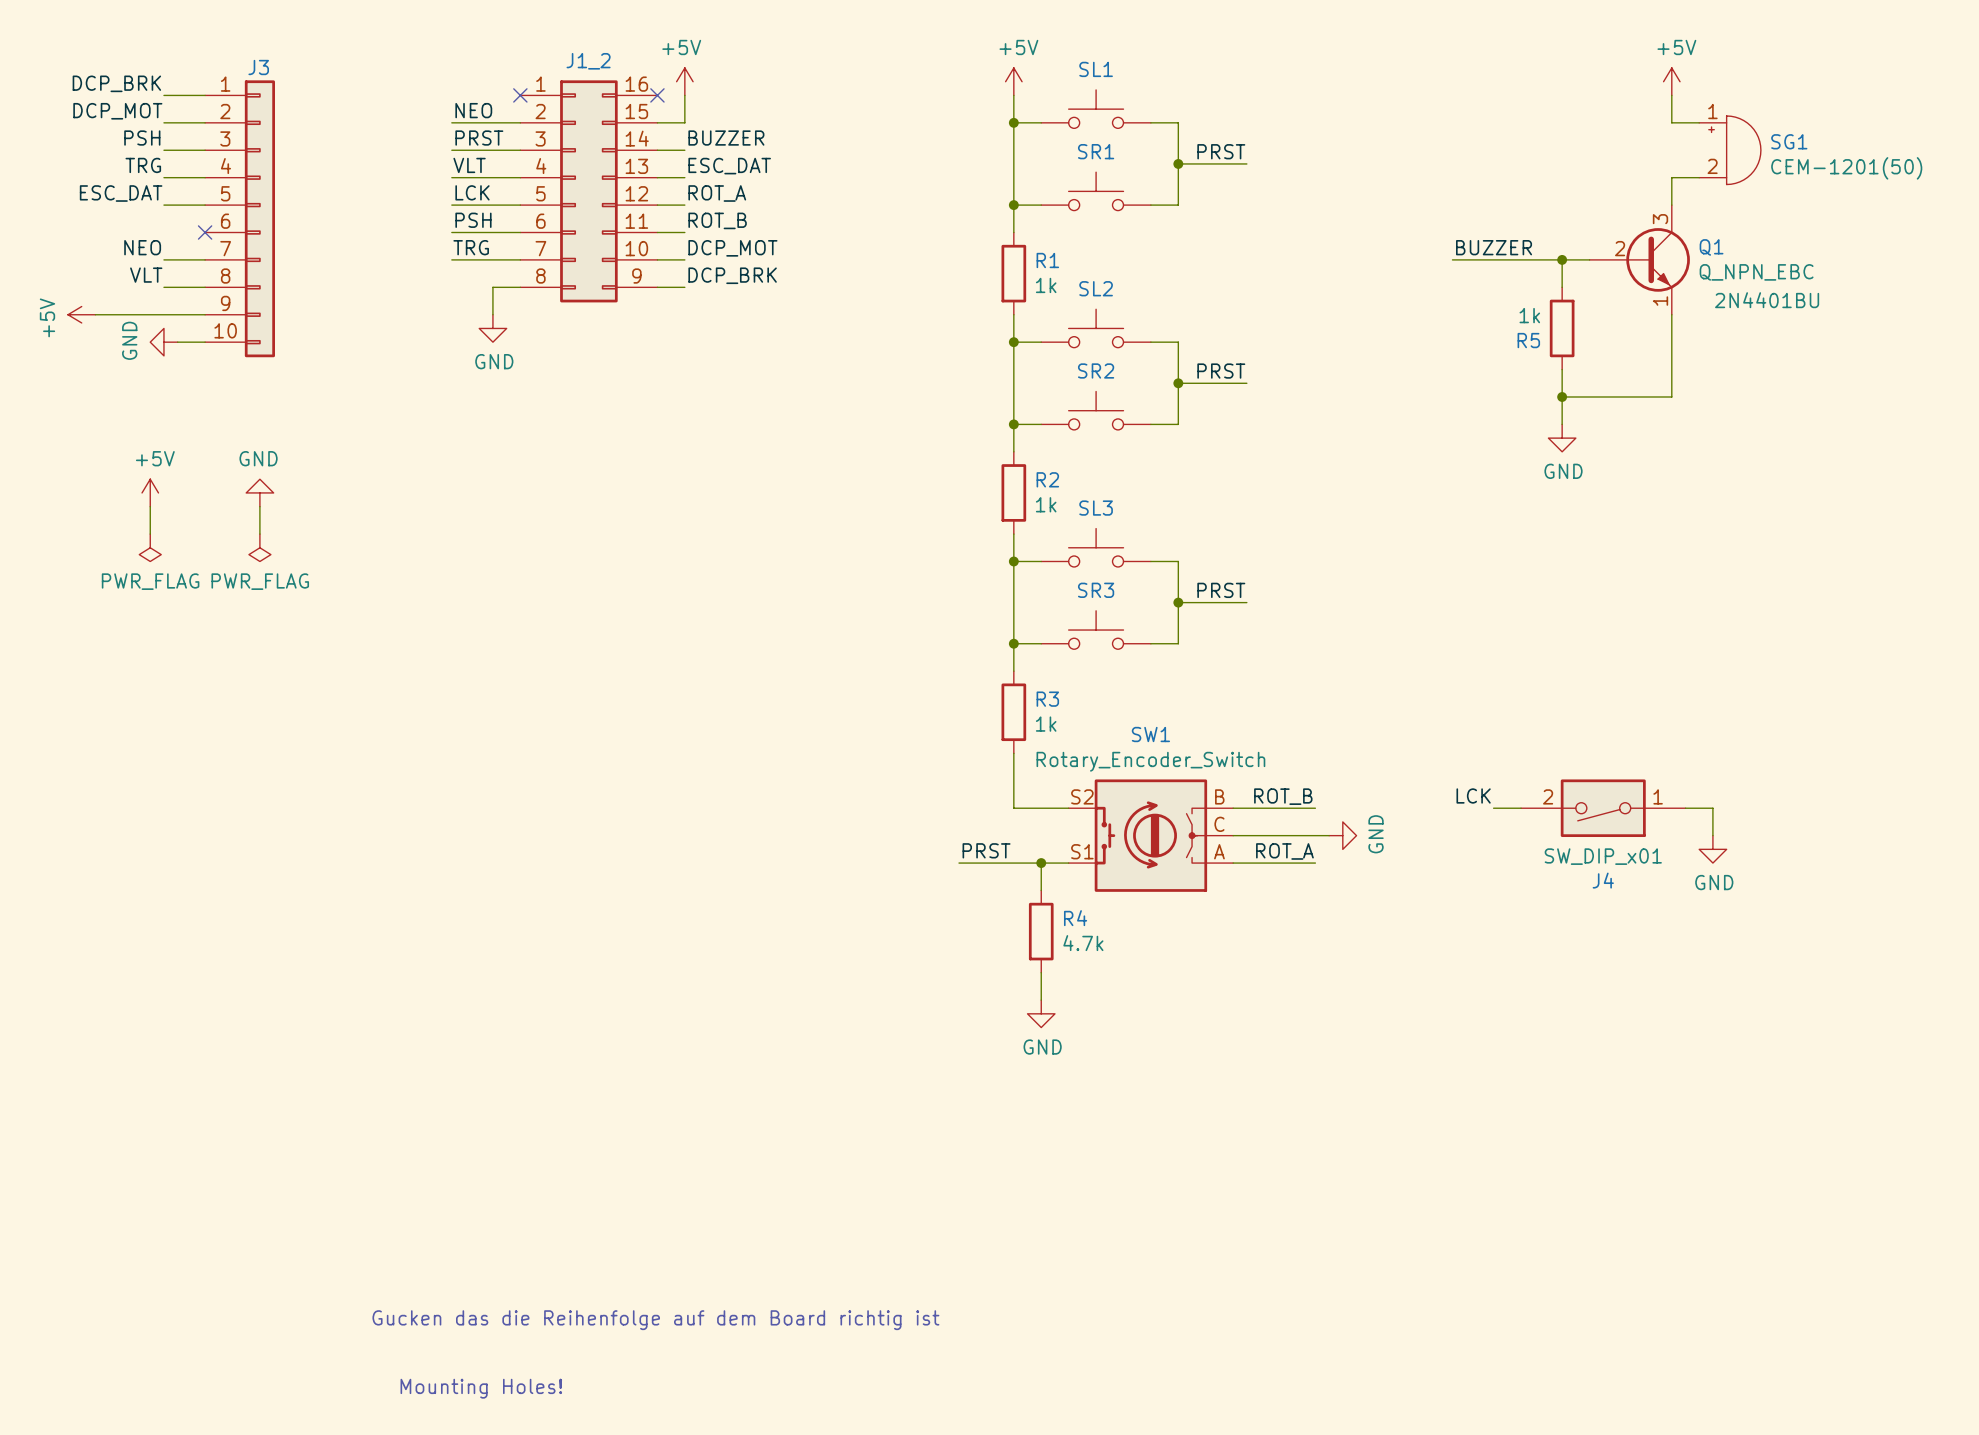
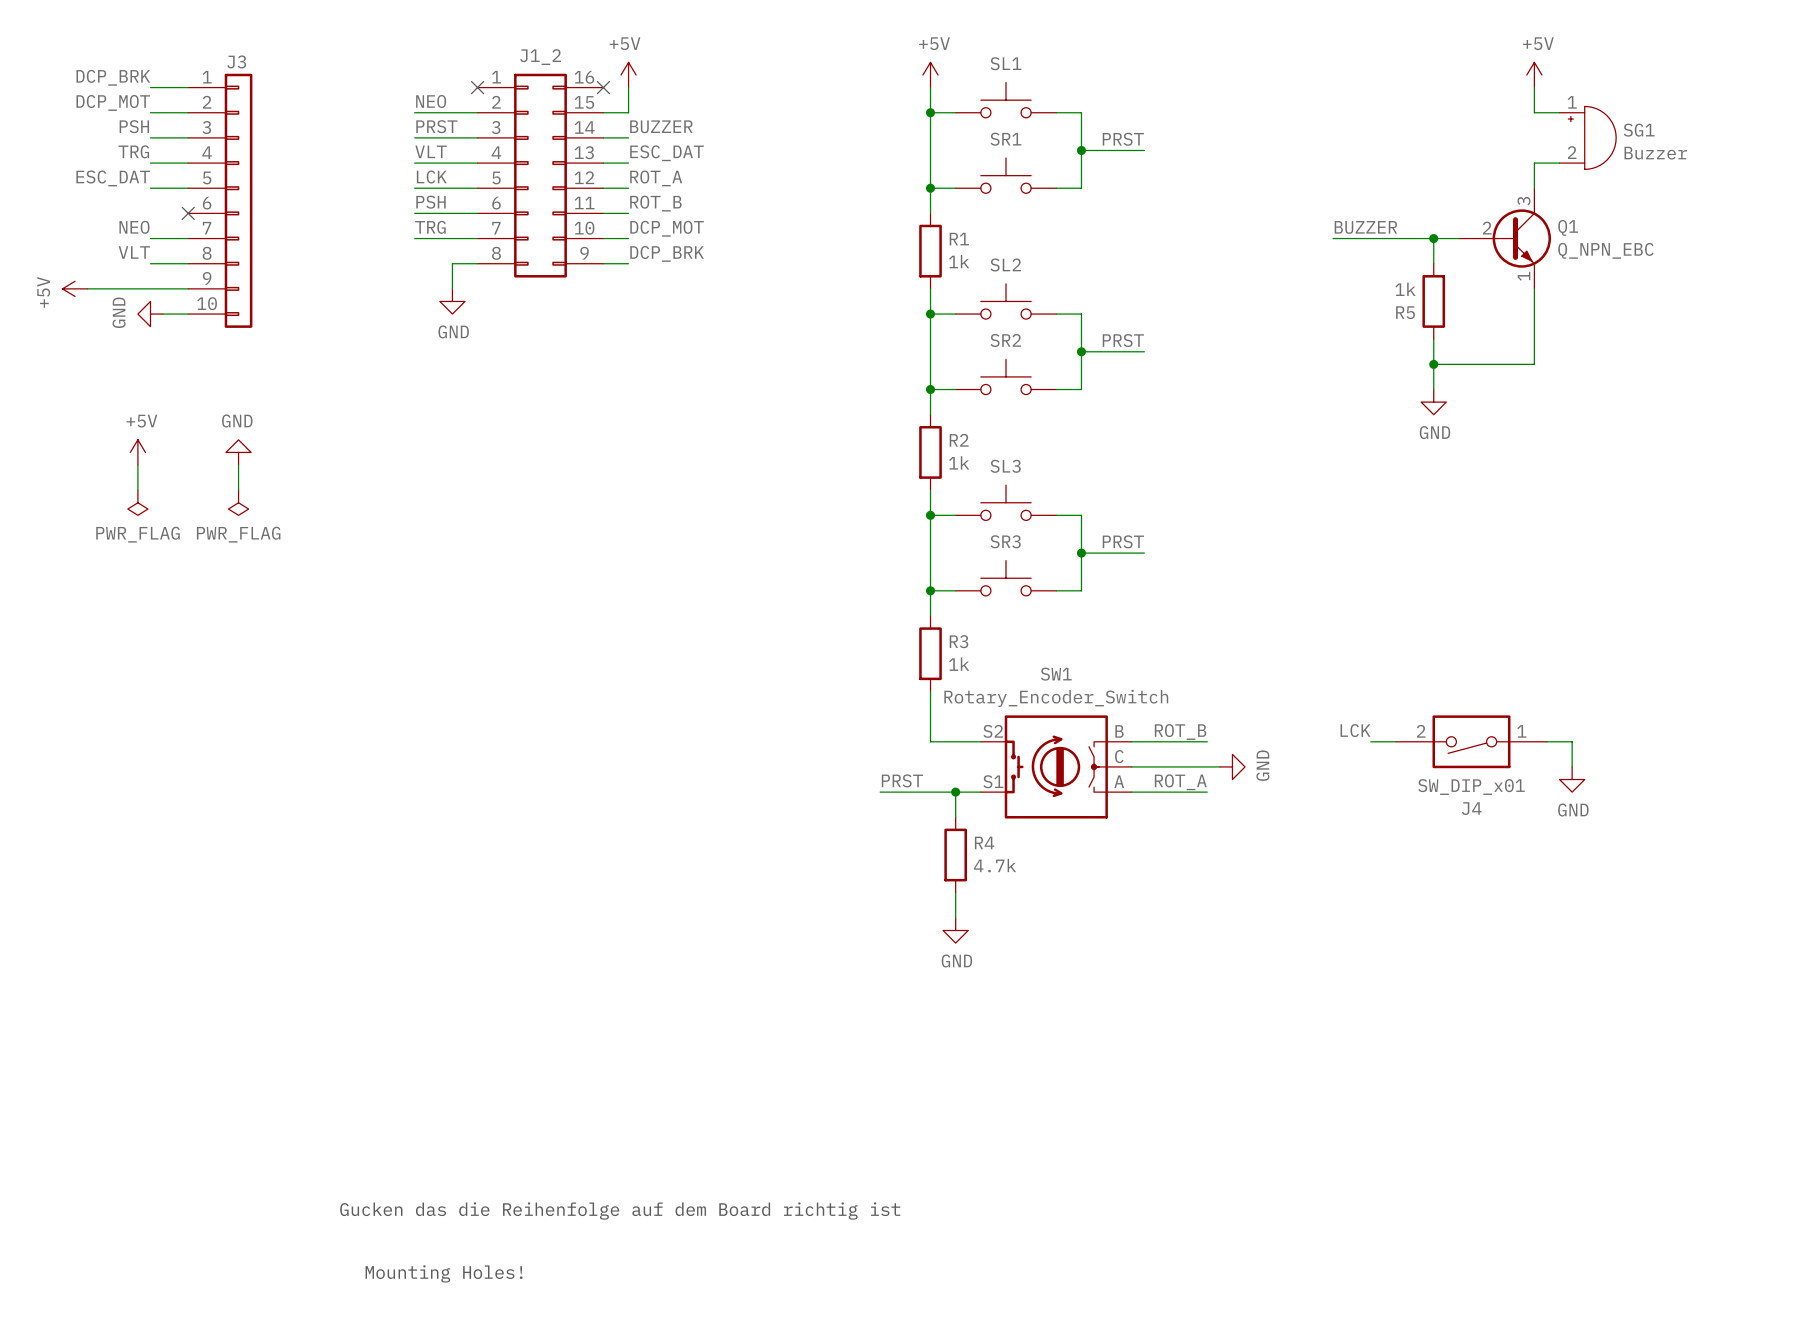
SG1 value: CEM-1201(50) (1846, 168) -> Buzzer (1655, 153)
Q1 text: 2N4401BU (1767, 300) -> none

